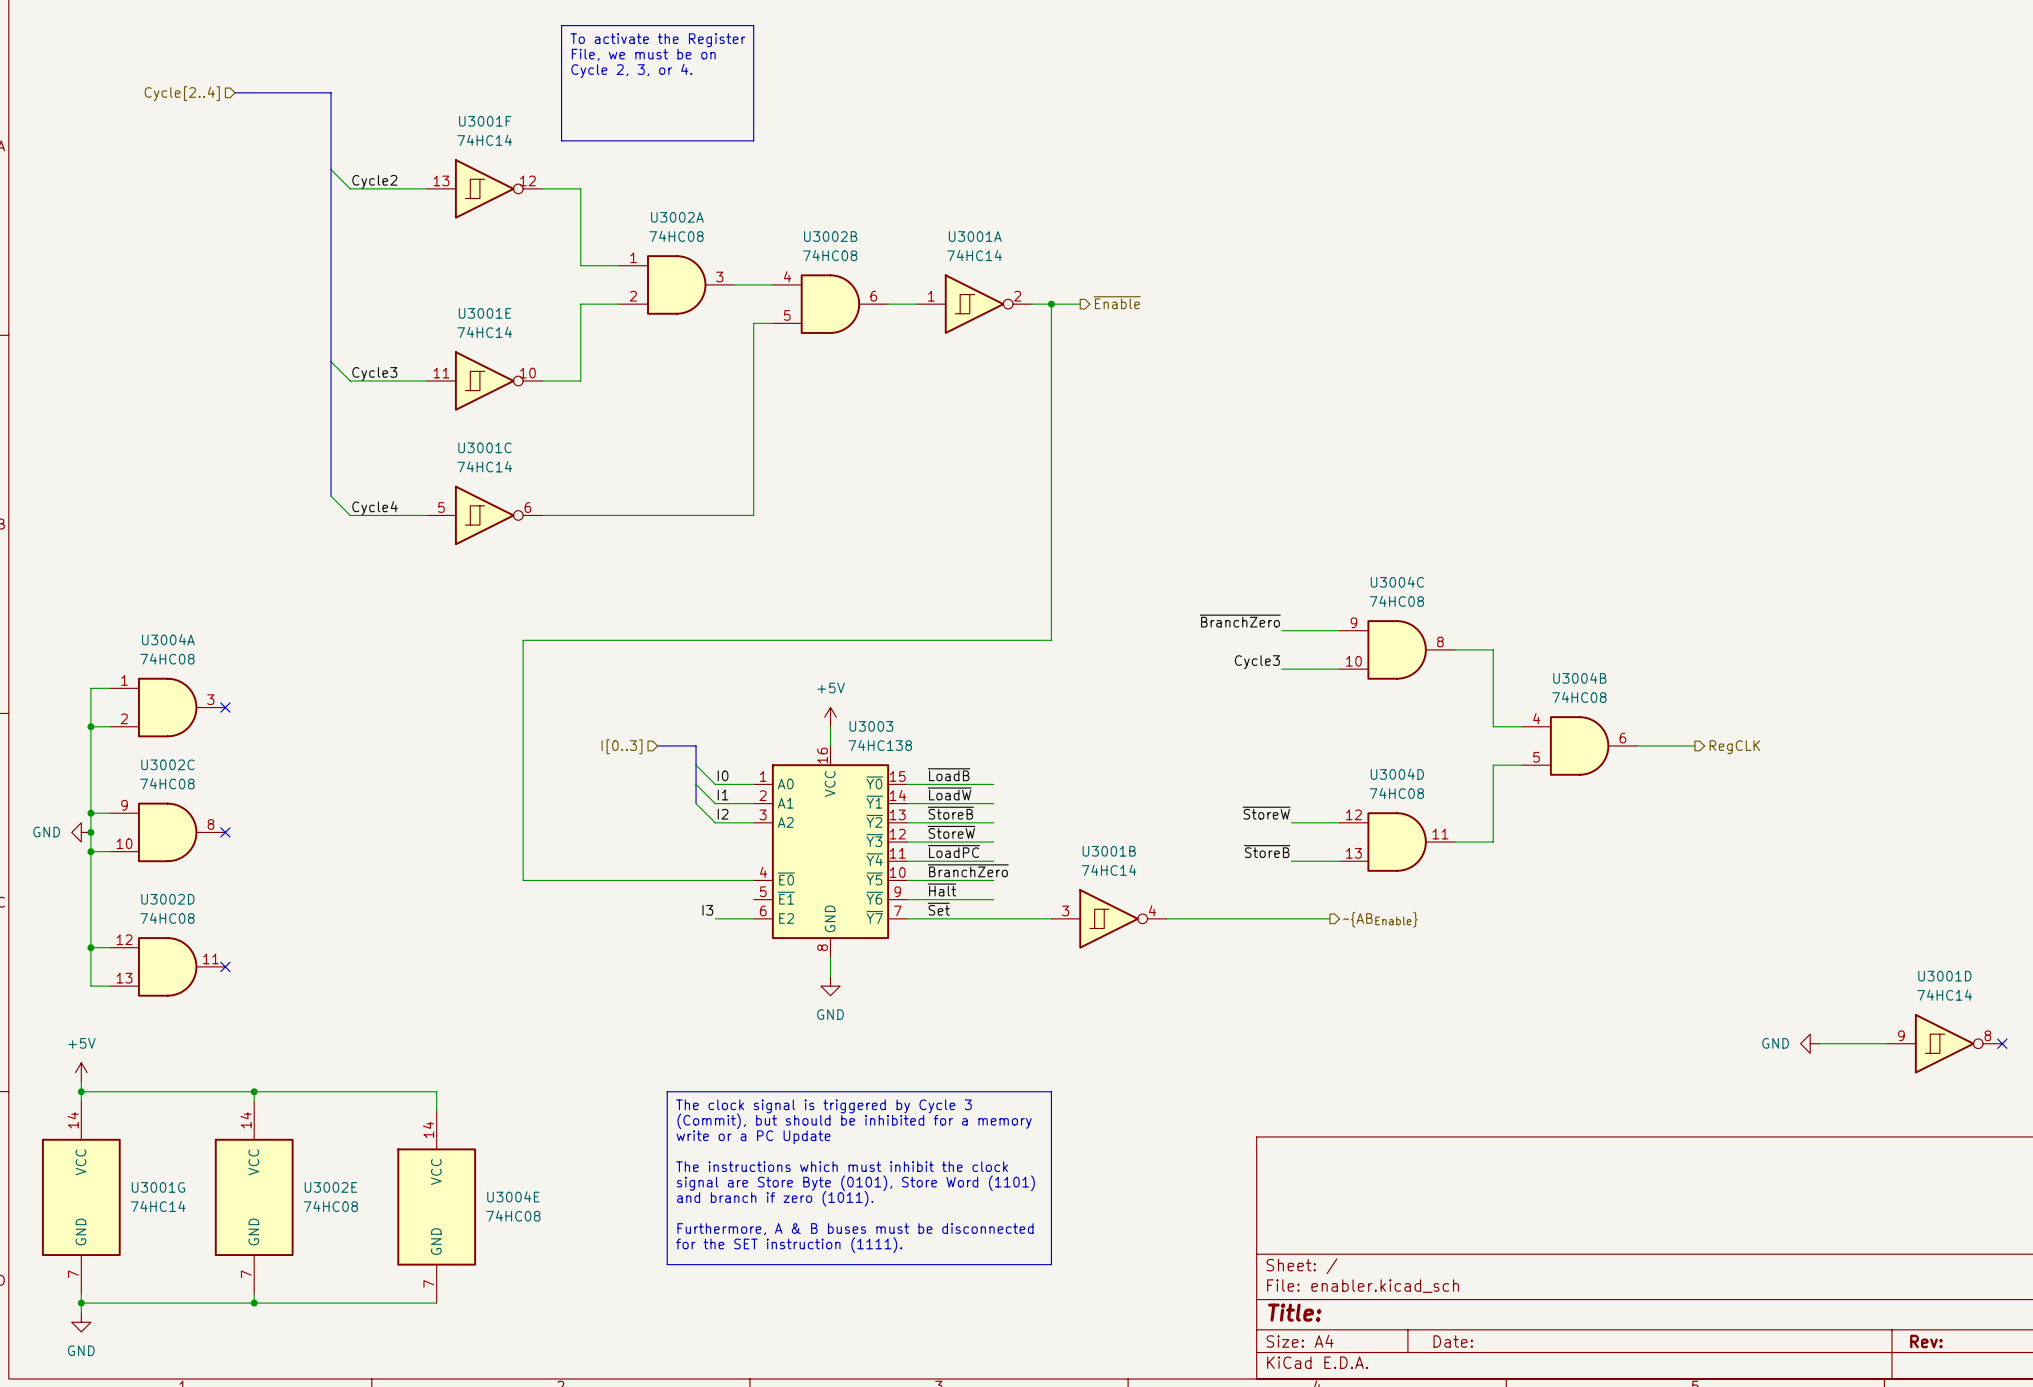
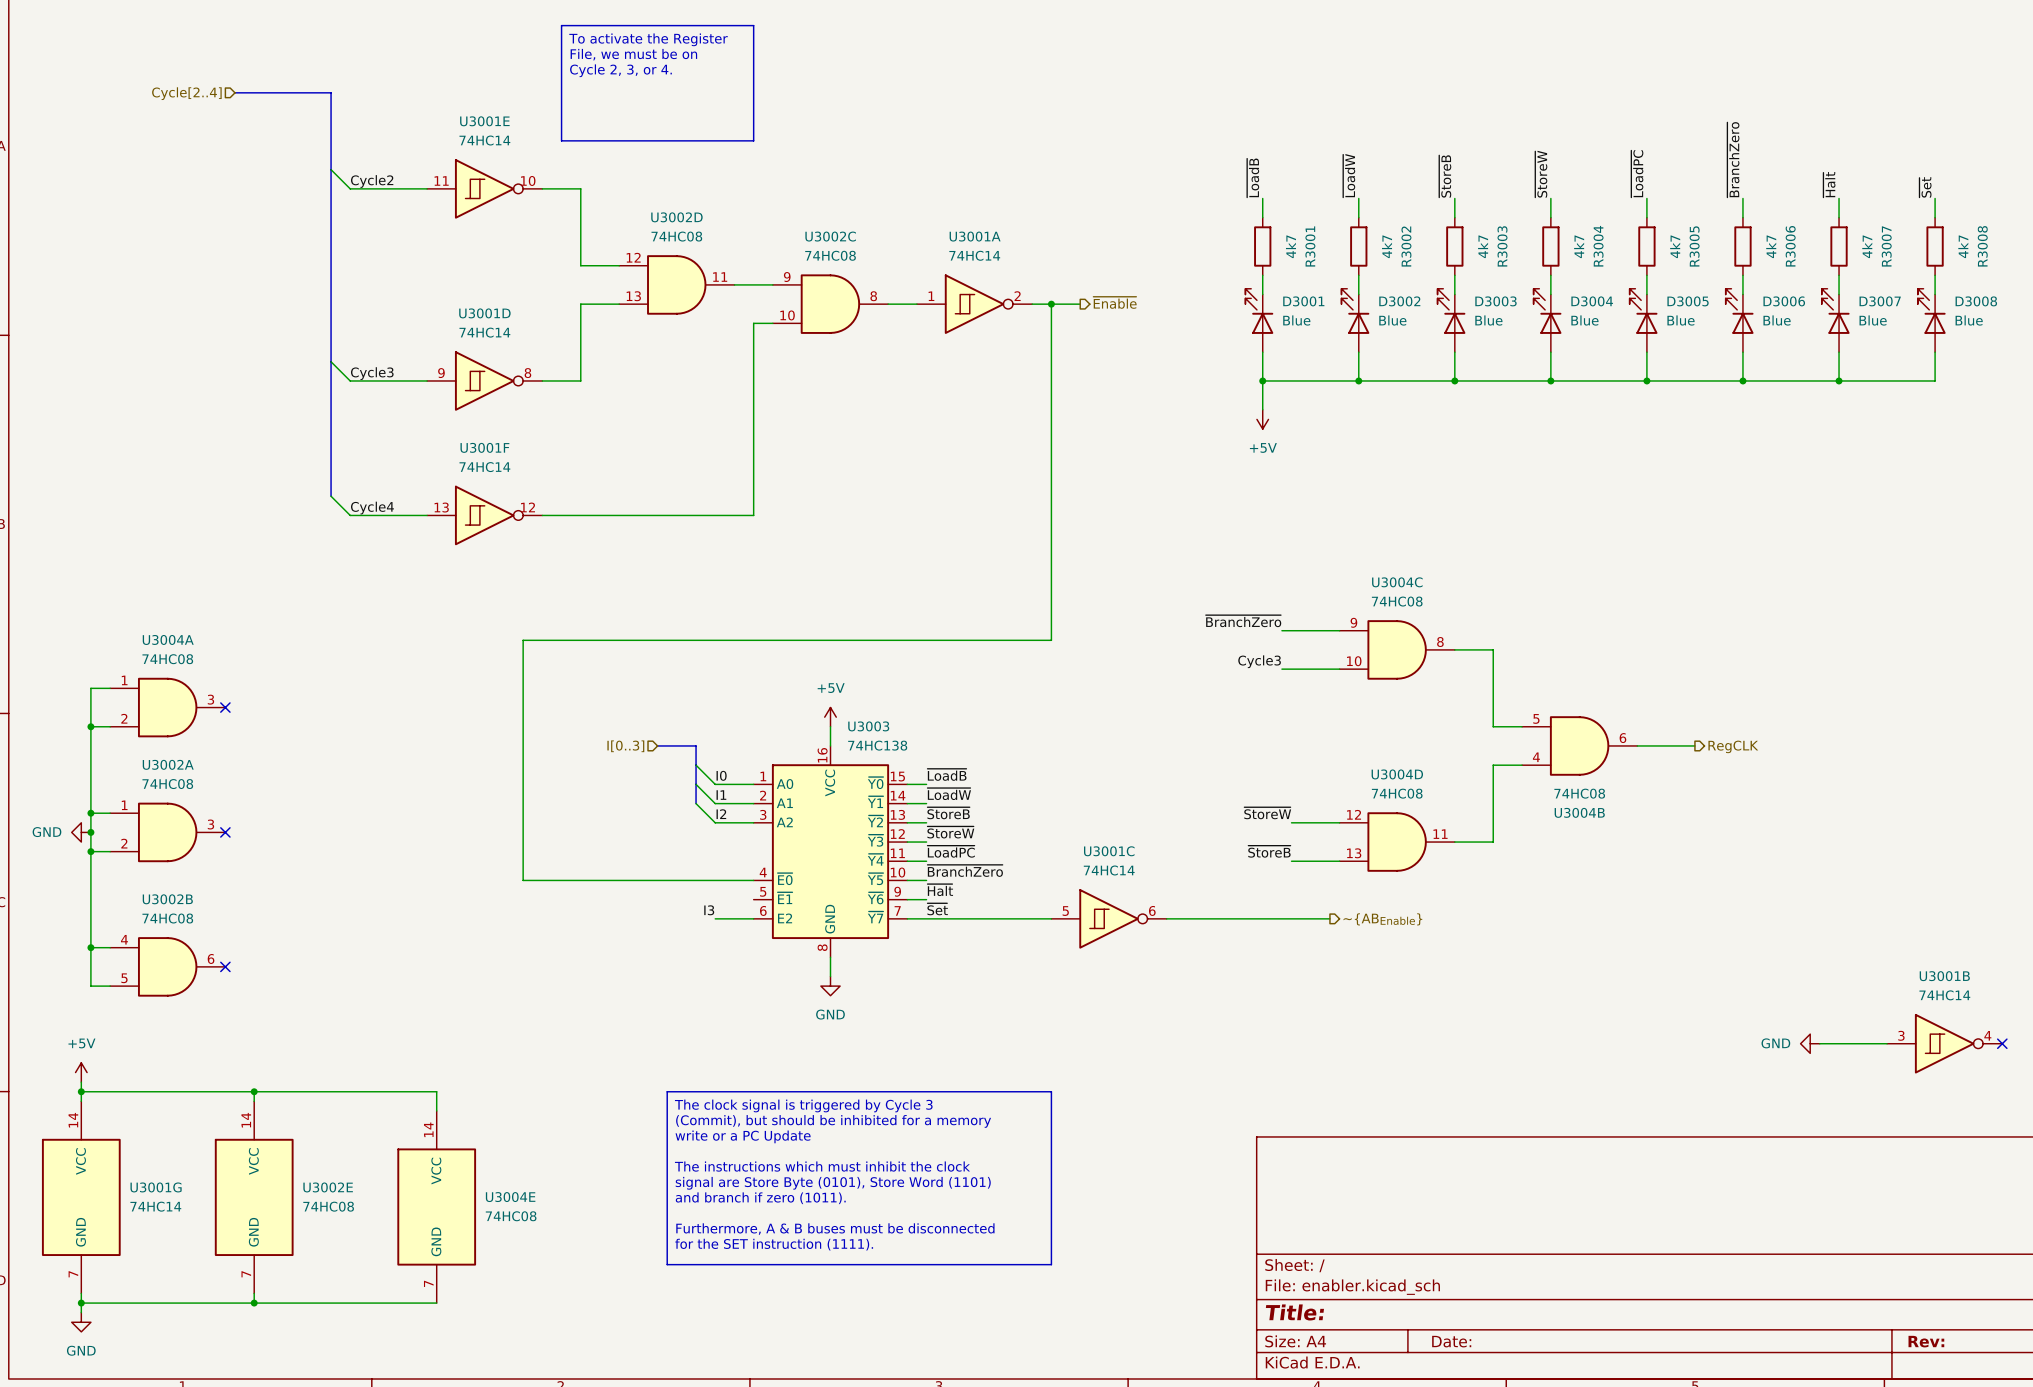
label: none -> ~{BranchZero} (1733, 159)
label: none -> ~{LoadPC} (1637, 173)
label: none -> ~{StoreW} (1541, 174)
label: none -> ~{StoreB} (1445, 176)
label: none -> ~{LoadW} (1349, 175)
label: none -> ~{LoadB} (1253, 178)
label: none -> ~{Halt} (1829, 184)
label: none -> ~{Set} (1925, 187)
U3001F position: (484, 188) -> (484, 515)
wire: none -> (1262, 198) (1262, 217)
wire: none -> (1358, 198) (1358, 217)
wire: none -> (1454, 198) (1454, 217)
wire: none -> (1550, 198) (1550, 217)
wire: none -> (1646, 198) (1646, 217)
wire: none -> (1742, 198) (1742, 217)
wire: none -> (1839, 198) (1839, 217)
wire: none -> (1935, 198) (1935, 217)
R3001: none -> 4k7 (1262, 246)
R3002: none -> 4k7 (1358, 246)
R3003: none -> 4k7 (1454, 246)
R3004: none -> 4k7 (1550, 246)
R3005: none -> 4k7 (1646, 246)
R3006: none -> 4k7 (1742, 246)
R3007: none -> 4k7 (1839, 246)
R3008: none -> 4k7 (1935, 246)
wire: none -> (1262, 275) (1262, 294)
wire: none -> (1358, 275) (1358, 294)
wire: none -> (1454, 275) (1454, 294)
wire: none -> (1550, 275) (1550, 294)
wire: none -> (1646, 275) (1646, 294)
wire: none -> (1742, 275) (1742, 294)
wire: none -> (1839, 275) (1839, 294)
wire: none -> (1935, 275) (1935, 294)
U3002A position: (676, 284) -> (167, 832)
U3002B position: (830, 304) -> (167, 966)
D3001: none -> Blue (1259, 320)
D3002: none -> Blue (1355, 320)
D3003: none -> Blue (1451, 320)
D3004: none -> Blue (1547, 320)
D3005: none -> Blue (1643, 320)
D3006: none -> Blue (1739, 320)
D3007: none -> Blue (1835, 320)
D3008: none -> Blue (1931, 320)
wire: none -> (1262, 352) (1262, 409)
wire: none -> (1358, 352) (1358, 380)
wire: none -> (1454, 352) (1454, 380)
wire: none -> (1550, 352) (1550, 380)
wire: none -> (1646, 352) (1646, 380)
wire: none -> (1742, 352) (1742, 380)
wire: none -> (1839, 352) (1839, 380)
wire: none -> (1935, 352) (1935, 380) (1262, 380)
U3001E position: (484, 380) -> (484, 188)
junction: none -> (1262, 380)
junction: none -> (1358, 380)
junction: none -> (1454, 380)
junction: none -> (1550, 380)
junction: none -> (1646, 380)
junction: none -> (1742, 380)
junction: none -> (1839, 380)
power symbol: none -> +5V (1262, 419)
U3001C position: (484, 515) -> (1109, 918)
U3004B flip: as is (1579, 745) -> up-down (1579, 745)
wire: (926, 784) (993, 784) -> none
wire: (926, 803) (993, 803) -> none
wire: (926, 822) (993, 822) -> none
U3002C position: (167, 832) -> (830, 304)
wire: (926, 842) (993, 842) -> none
wire: (926, 861) (993, 861) -> none
wire: (926, 880) (993, 880) -> none
wire: (926, 899) (993, 899) -> none
U3001B position: (1109, 918) -> (1944, 1043)
U3002D position: (167, 966) -> (676, 284)
U3001D position: (1944, 1043) -> (484, 380)

